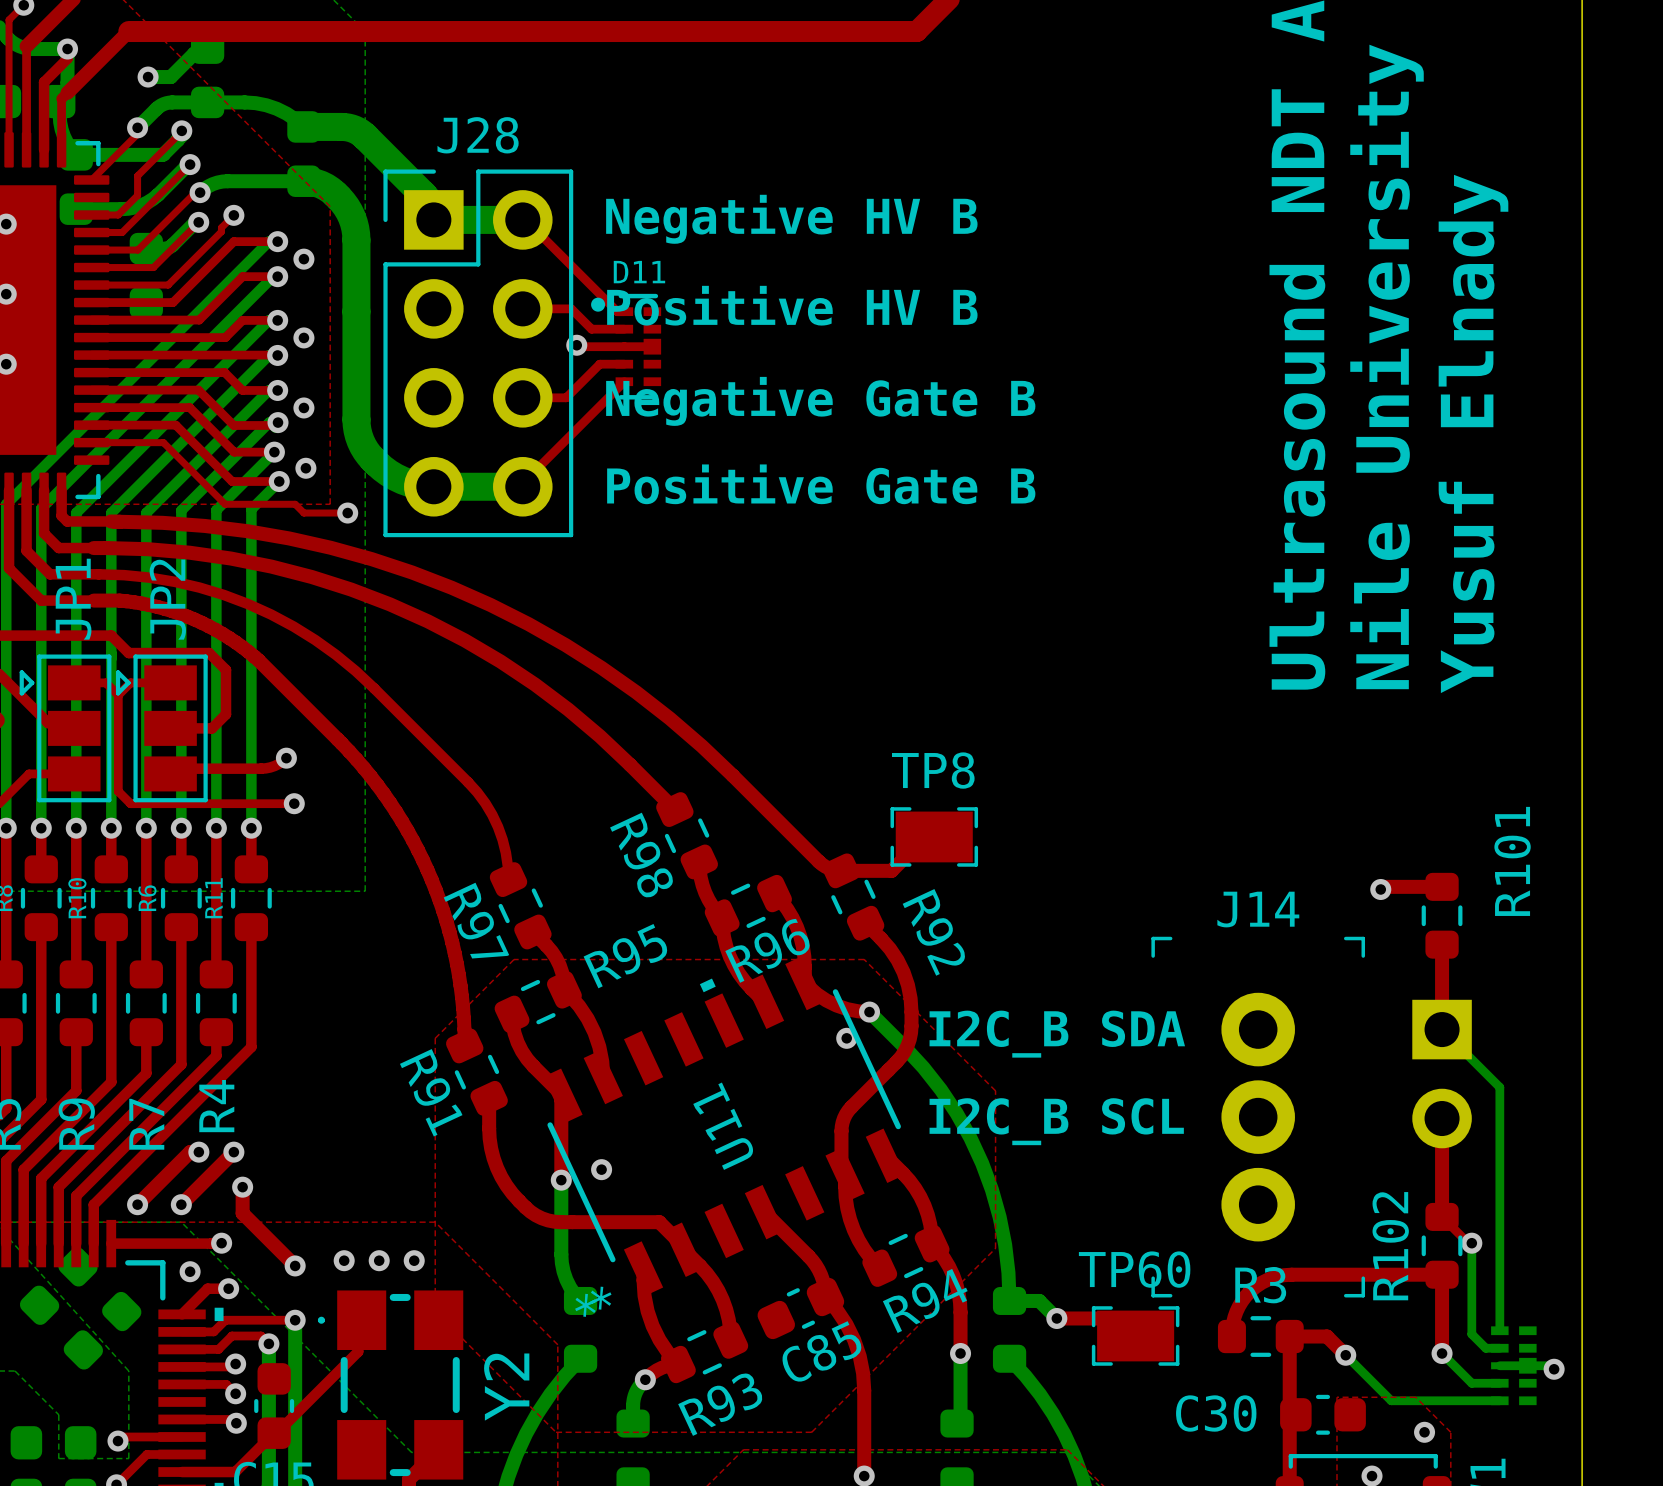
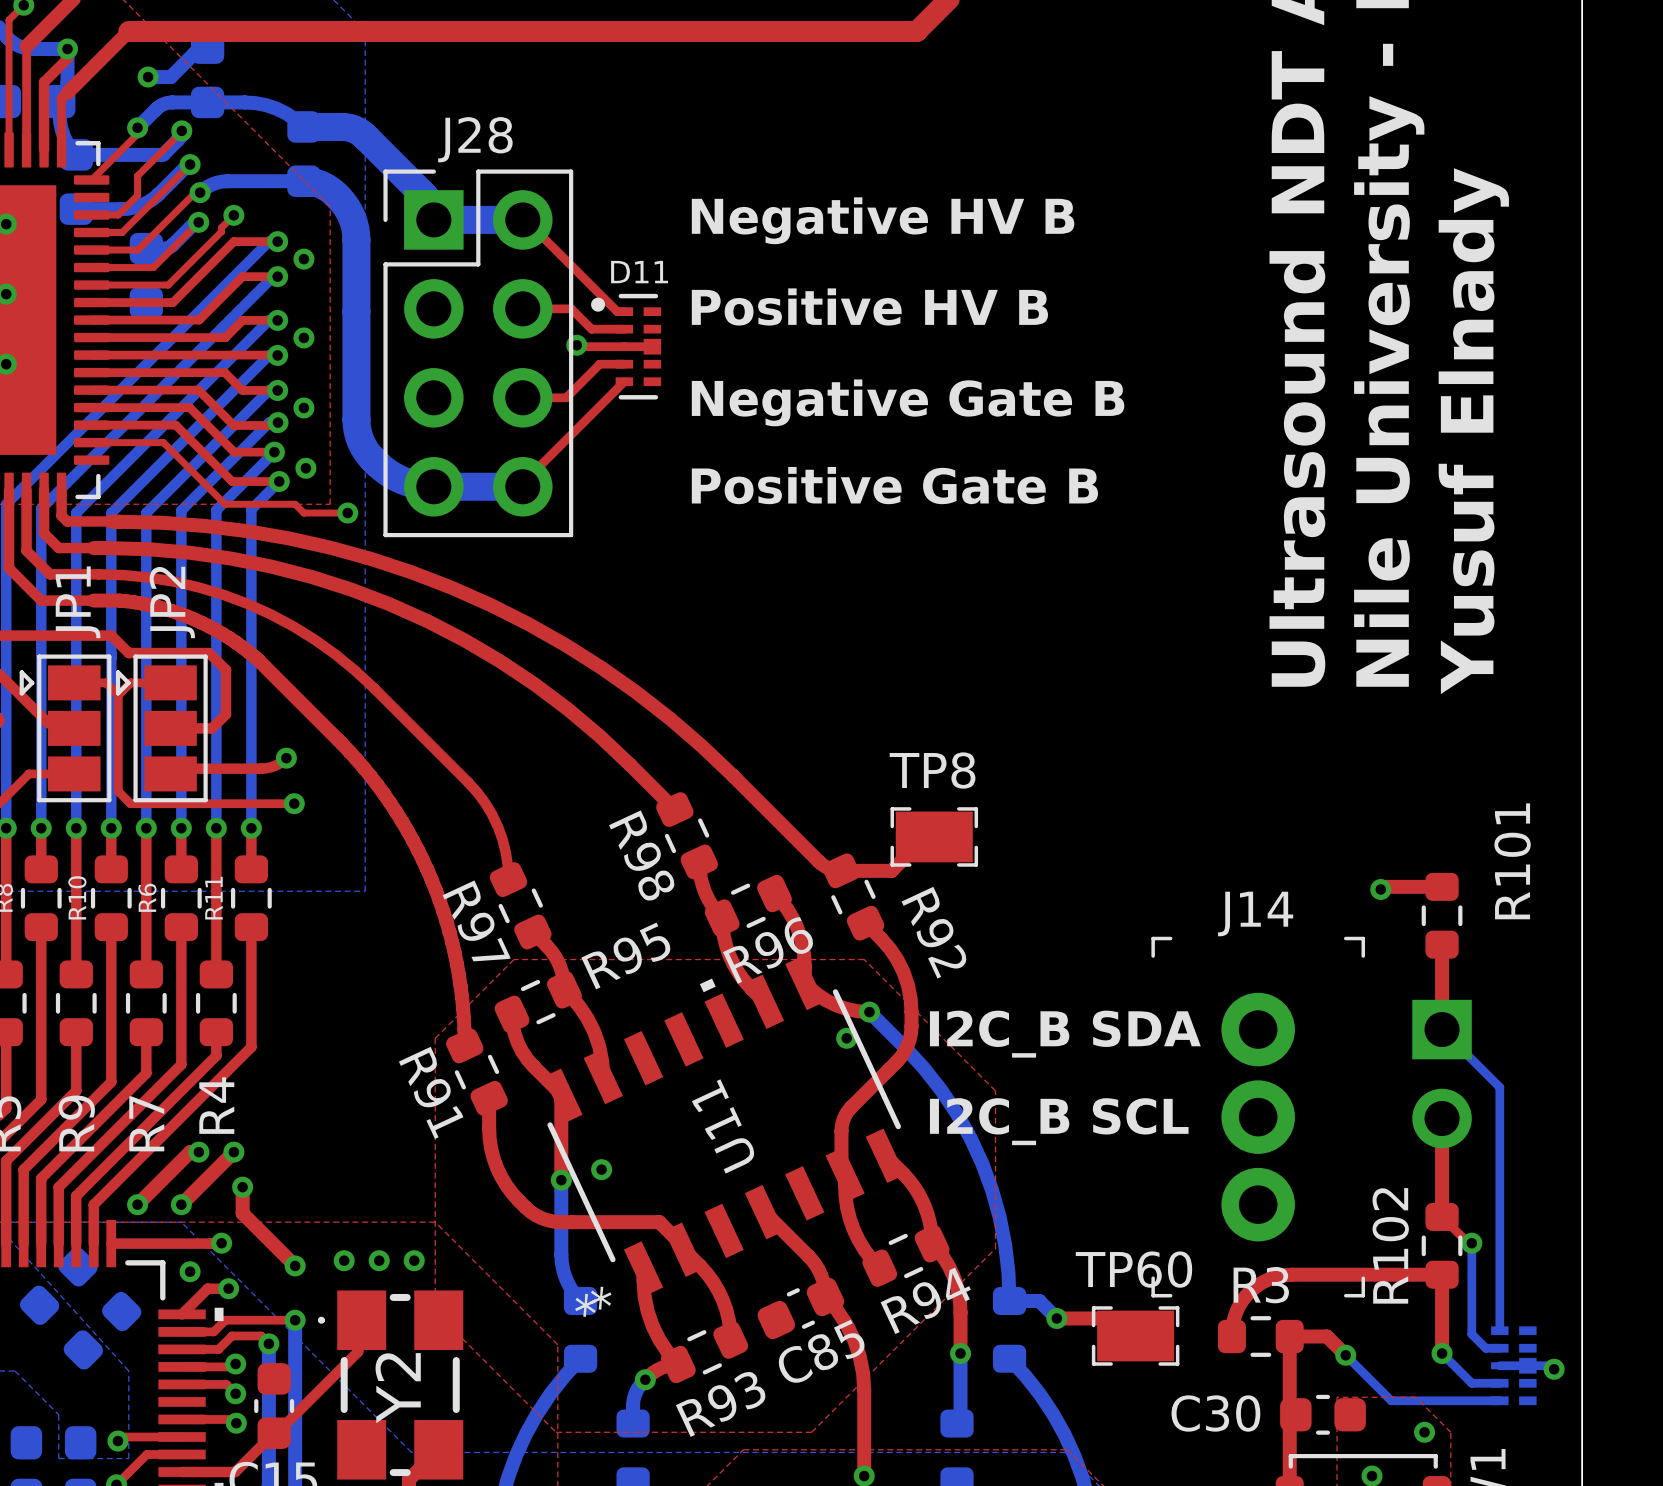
text position: Negative HV B (791, 219) -> Negative HV B (883, 220)
text position: Positive HV B (792, 305) -> Positive HV B (869, 306)
text position: Negative Gate B (820, 401) -> Negative Gate B (908, 402)
text position: Positive Gate B (821, 484) -> Positive Gate B (894, 485)
Y2 name position: Y2 (506, 1387) -> Y2 (398, 1388)

